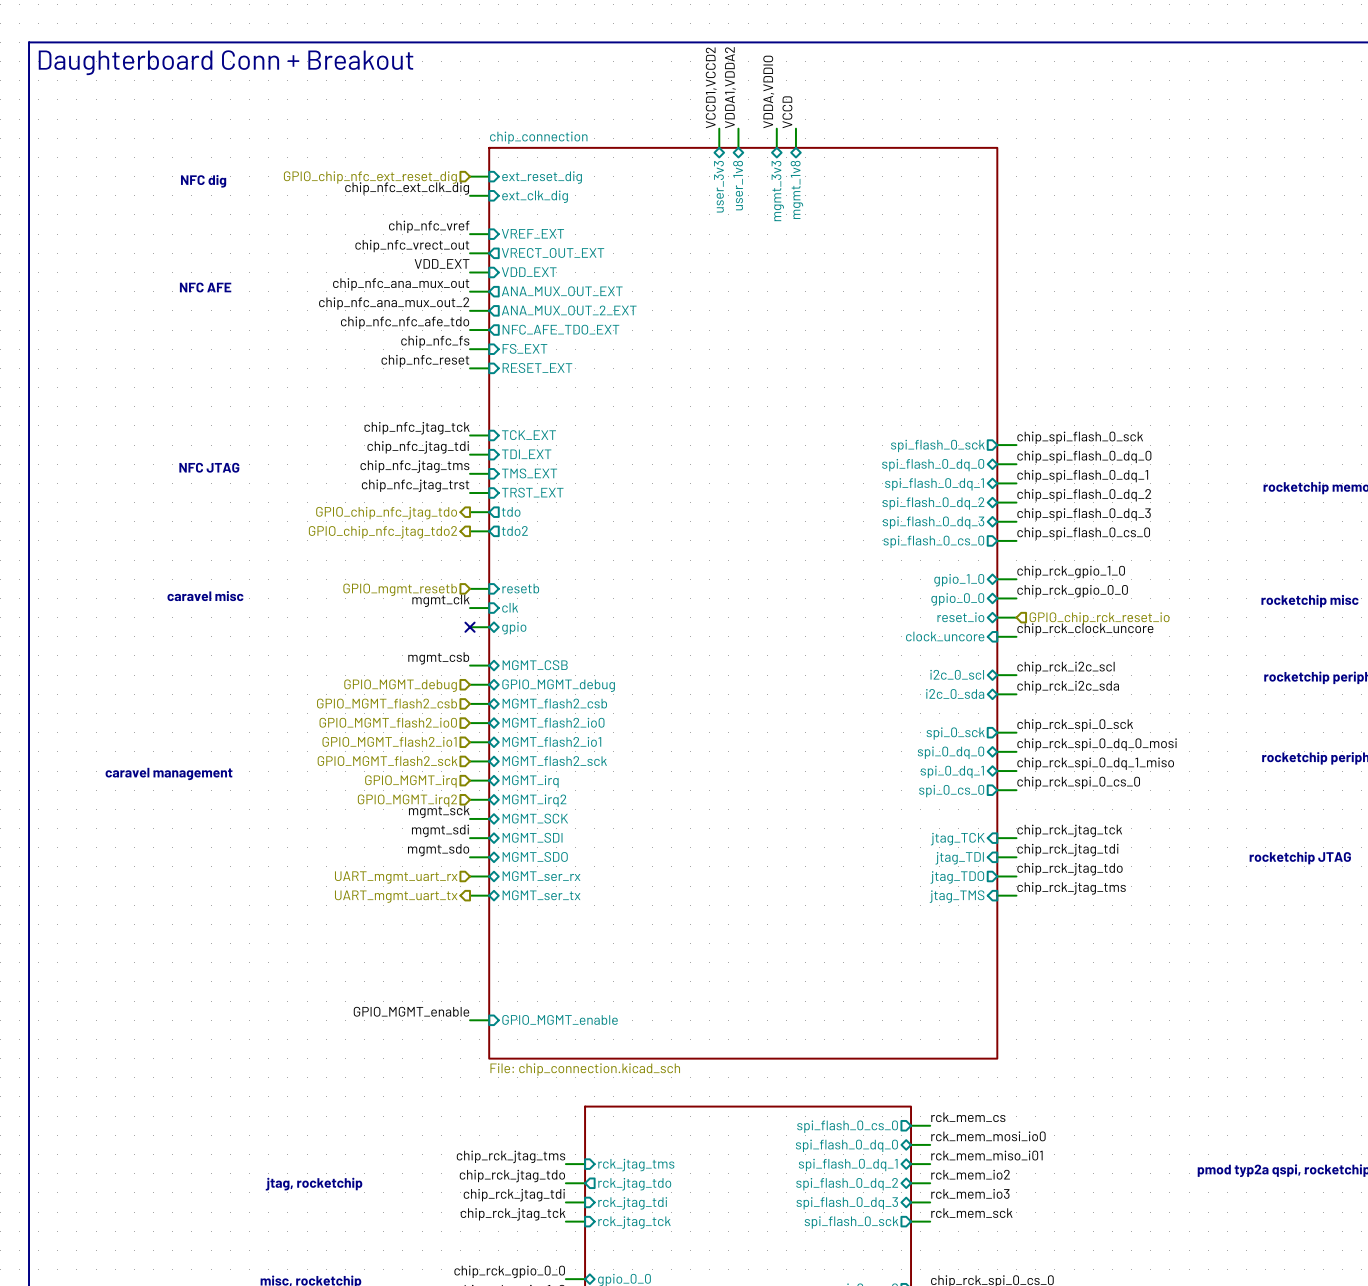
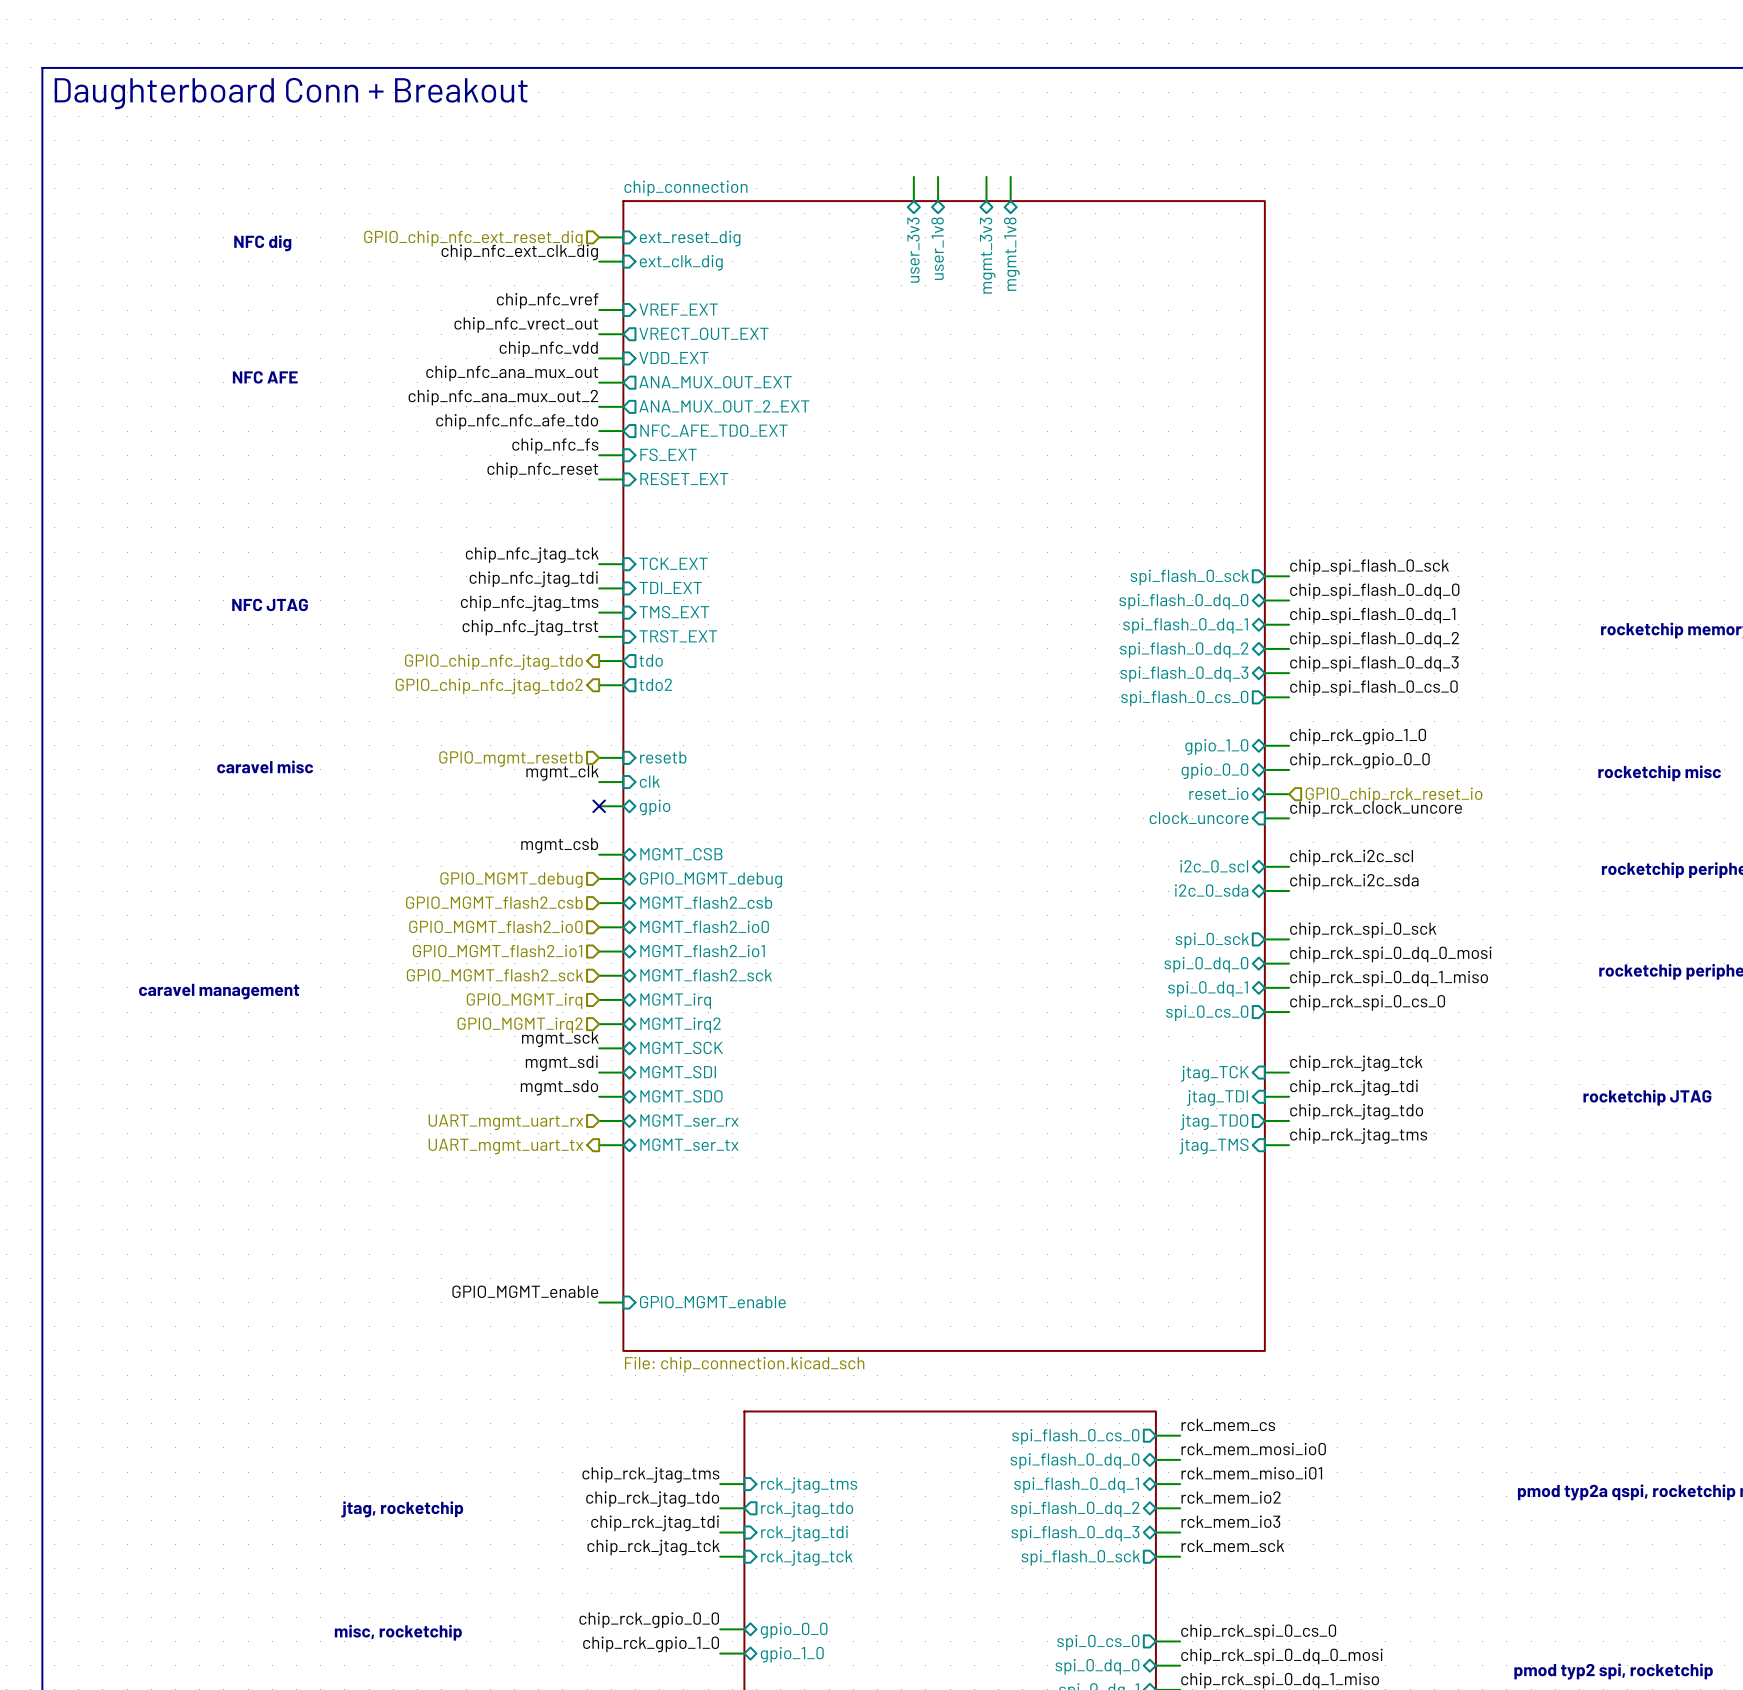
label: VCCD1,VCCD2 (711, 87) -> none
label: VDDA1,VDDA2 (730, 87) -> none
label: VDDA,VDDIO (768, 91) -> none
label: VCCD (787, 112) -> none
label: VDD_EXT (442, 263) -> chip_nfc_vdd (548, 349)

